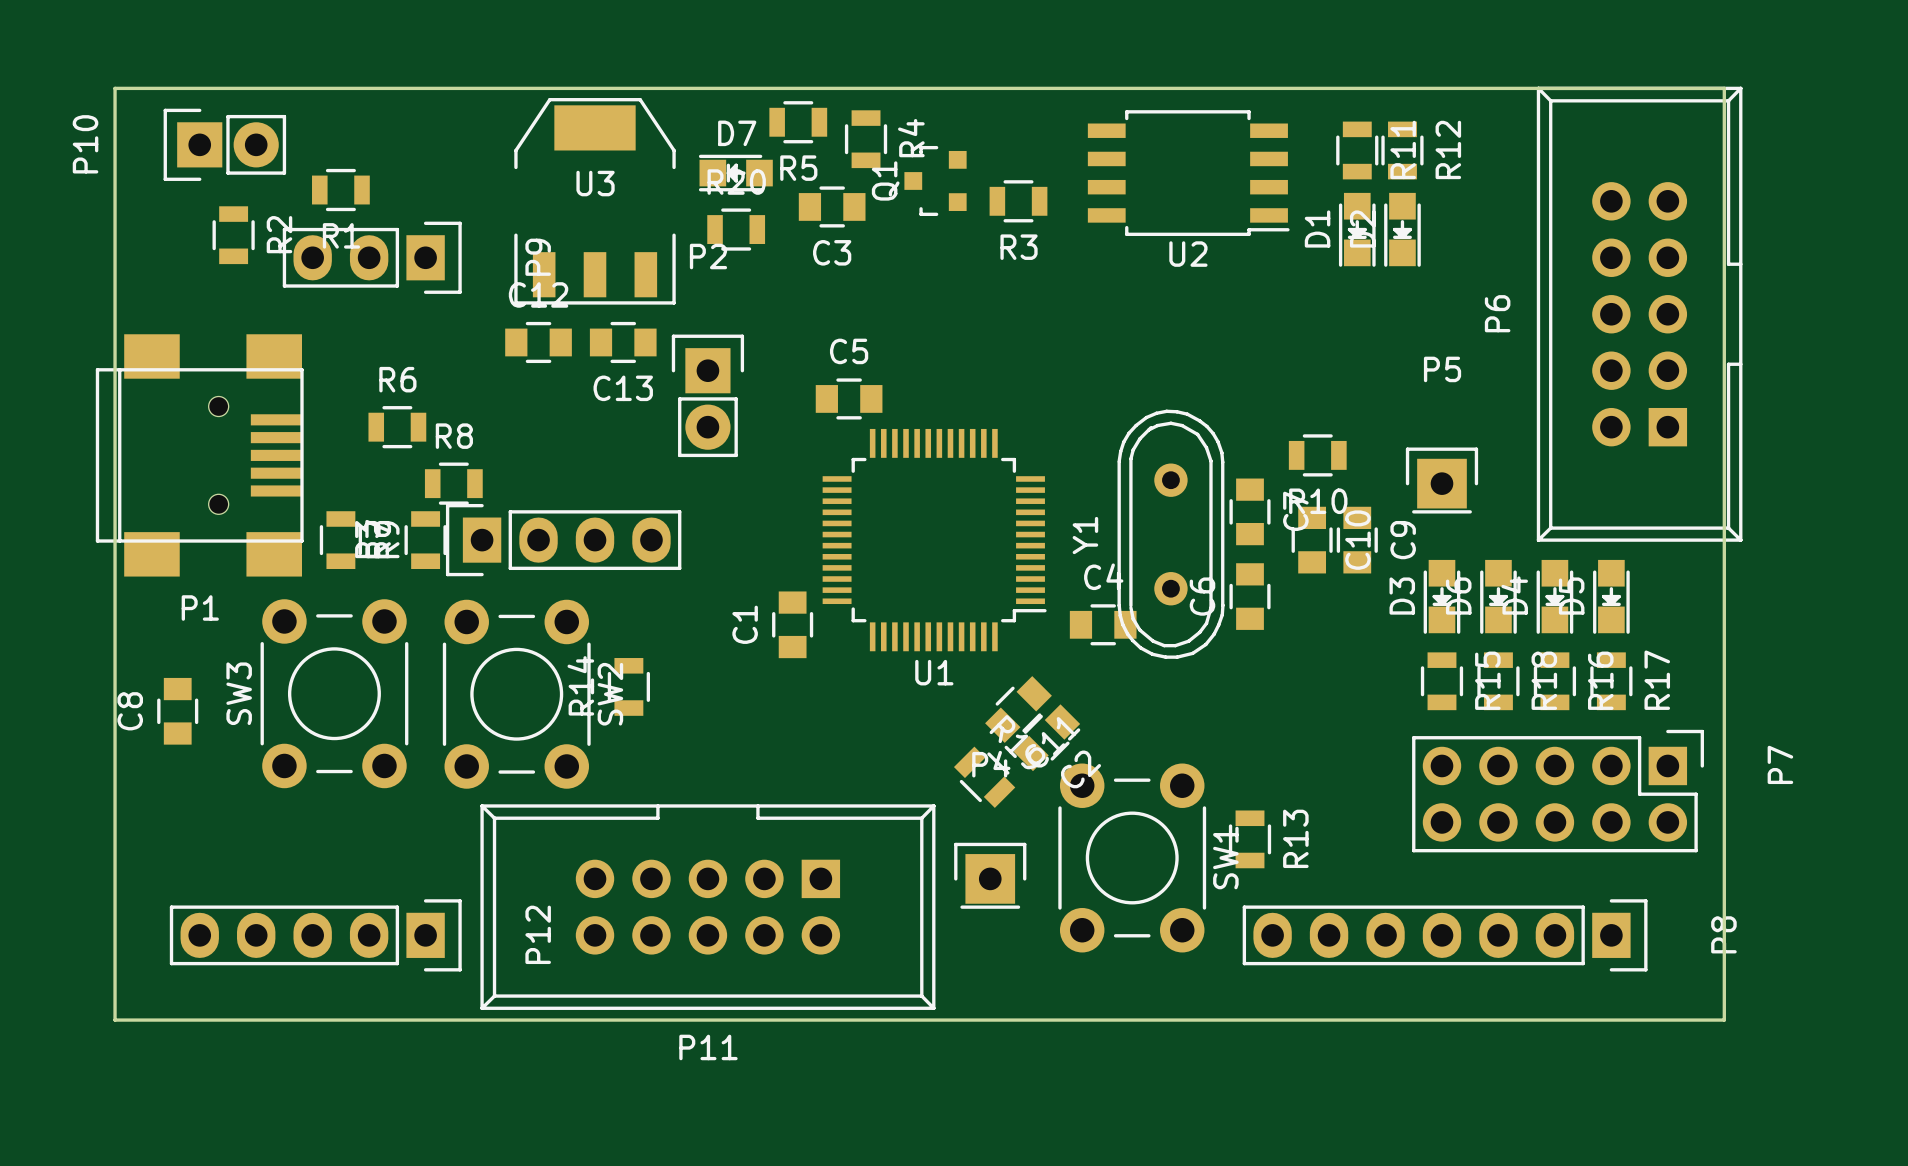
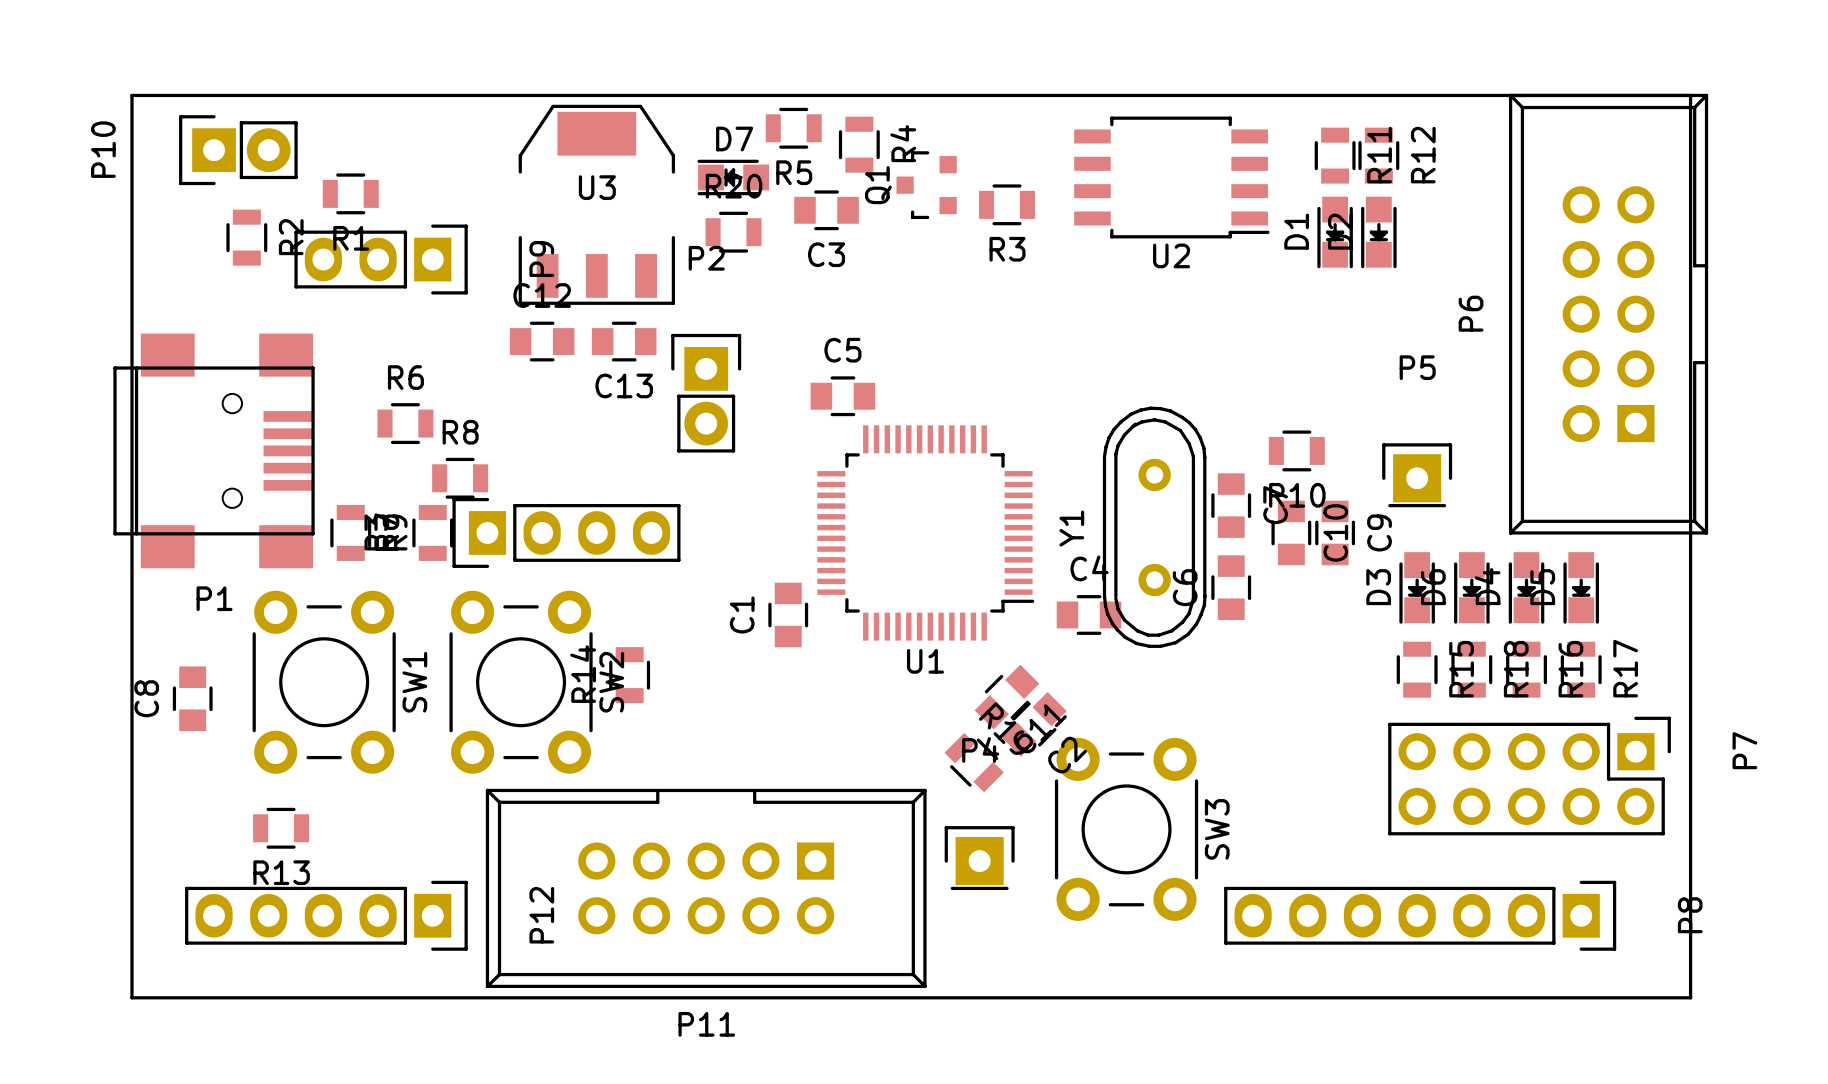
SW3 name position: SW3 (239, 693) -> SW3 (1217, 829)
SW3 position: (334, 693) -> (1126, 829)
R13 rotation: 0° (1250, 839) -> 90° clockwise (281, 828)
R13 position: (1250, 839) -> (281, 828)
SW1 position: (1132, 857) -> (324, 682)

